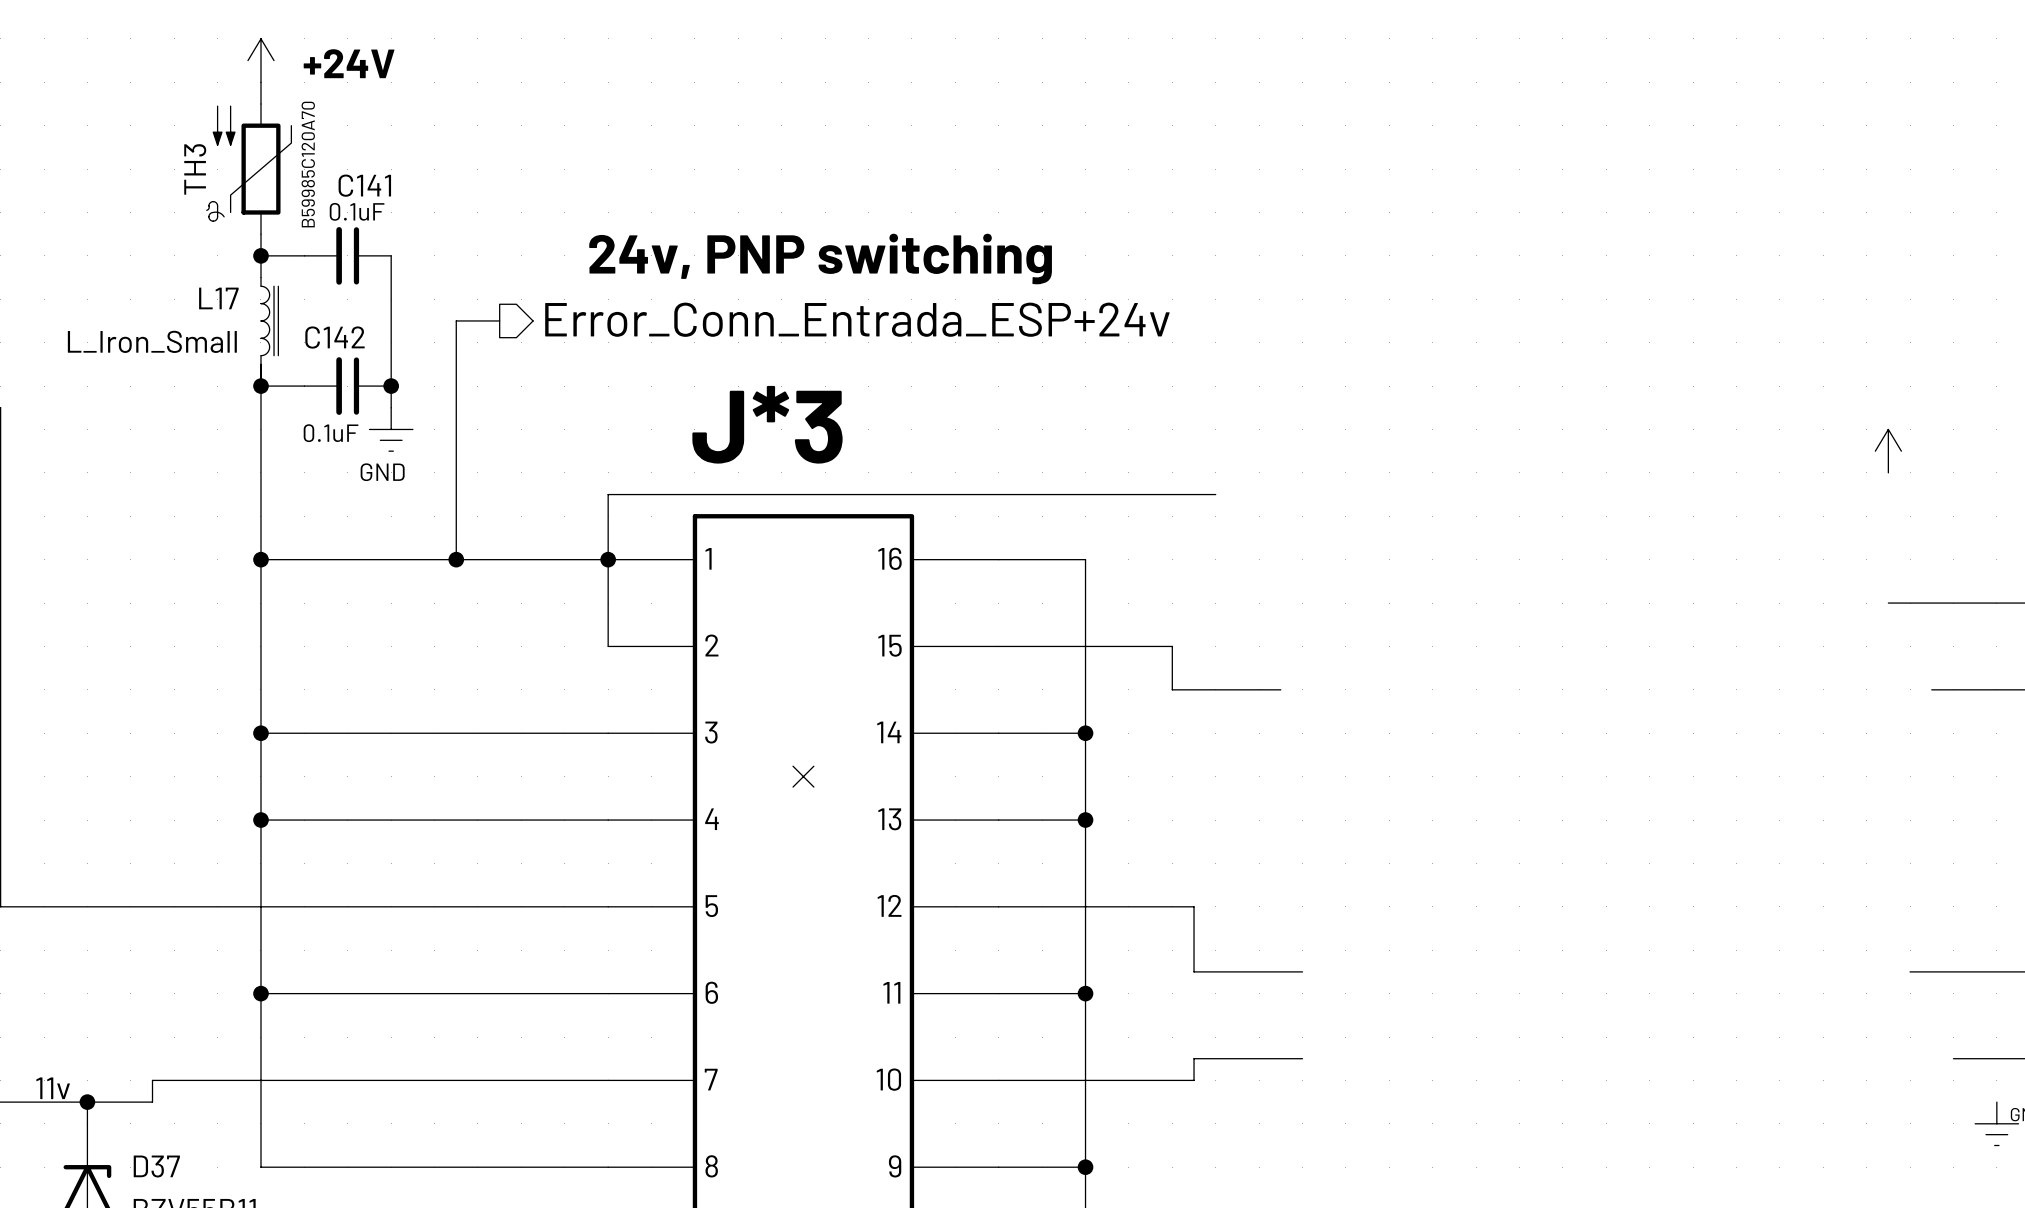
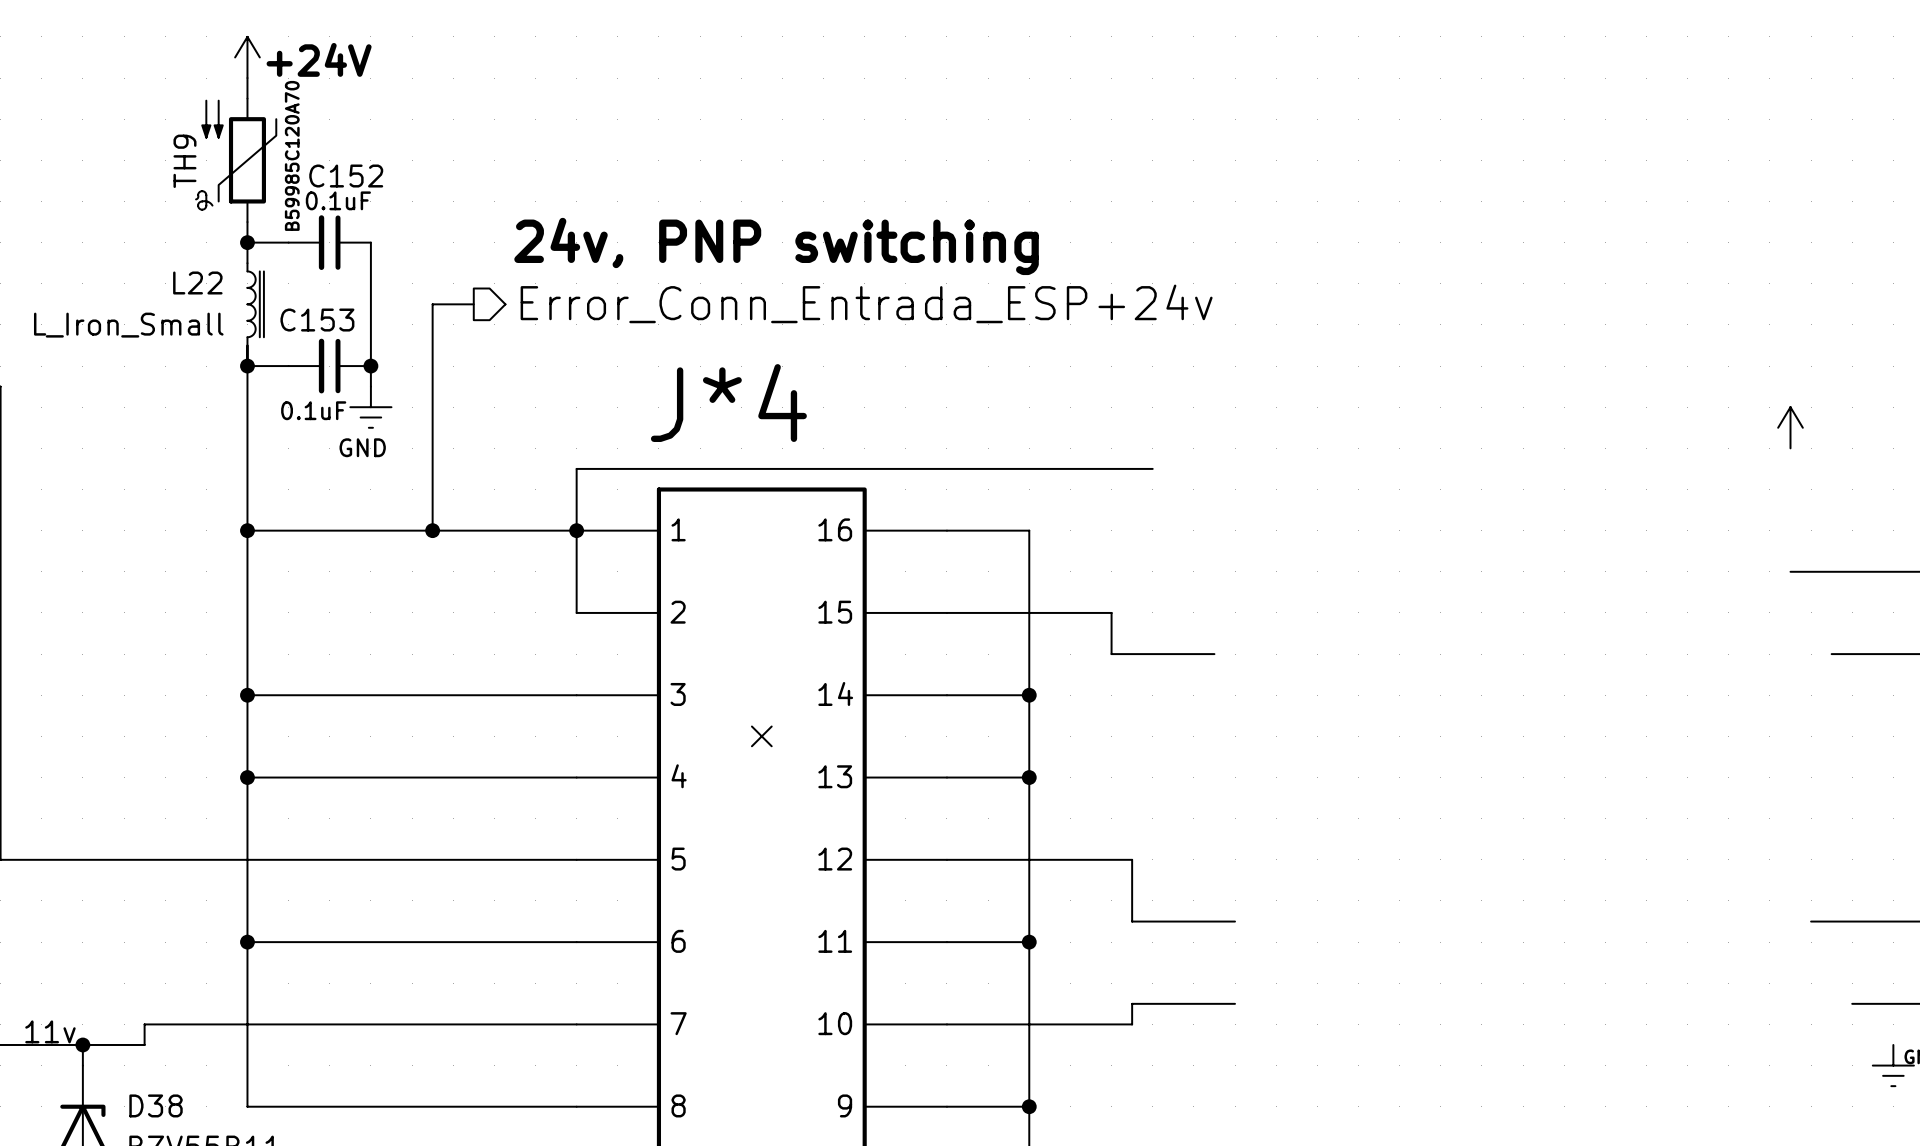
TH3 name: TH3 (195, 169) -> TH9 (184, 161)
C141 name: C141 (364, 185) -> C152 (346, 176)
L17 name: L17 (218, 298) -> L22 (197, 282)
C142 name: C142 (334, 337) -> C153 (317, 320)
J*3 name: J*3 (767, 424) -> J*4 (728, 403)
D37 name: D37 (156, 1166) -> D38 (156, 1105)

